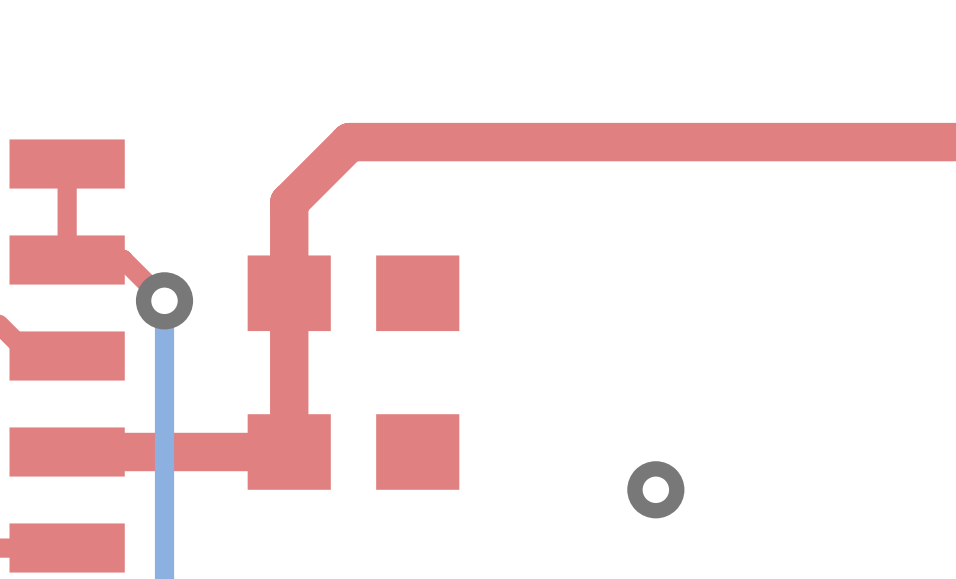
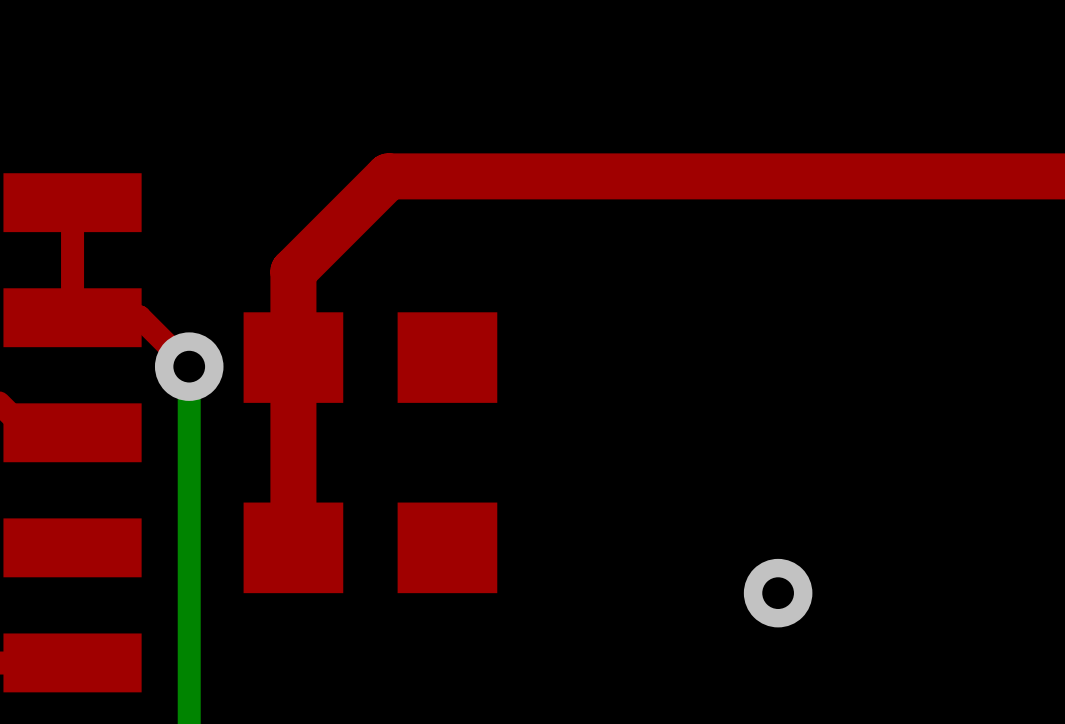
top track: (349, 142) (289, 202) (289, 452) (67, 452) -> (411, 176) (388, 176) (293, 271) (293, 547)
part position: (353, 293) -> (370, 357)
part position: (353, 452) -> (370, 547)

